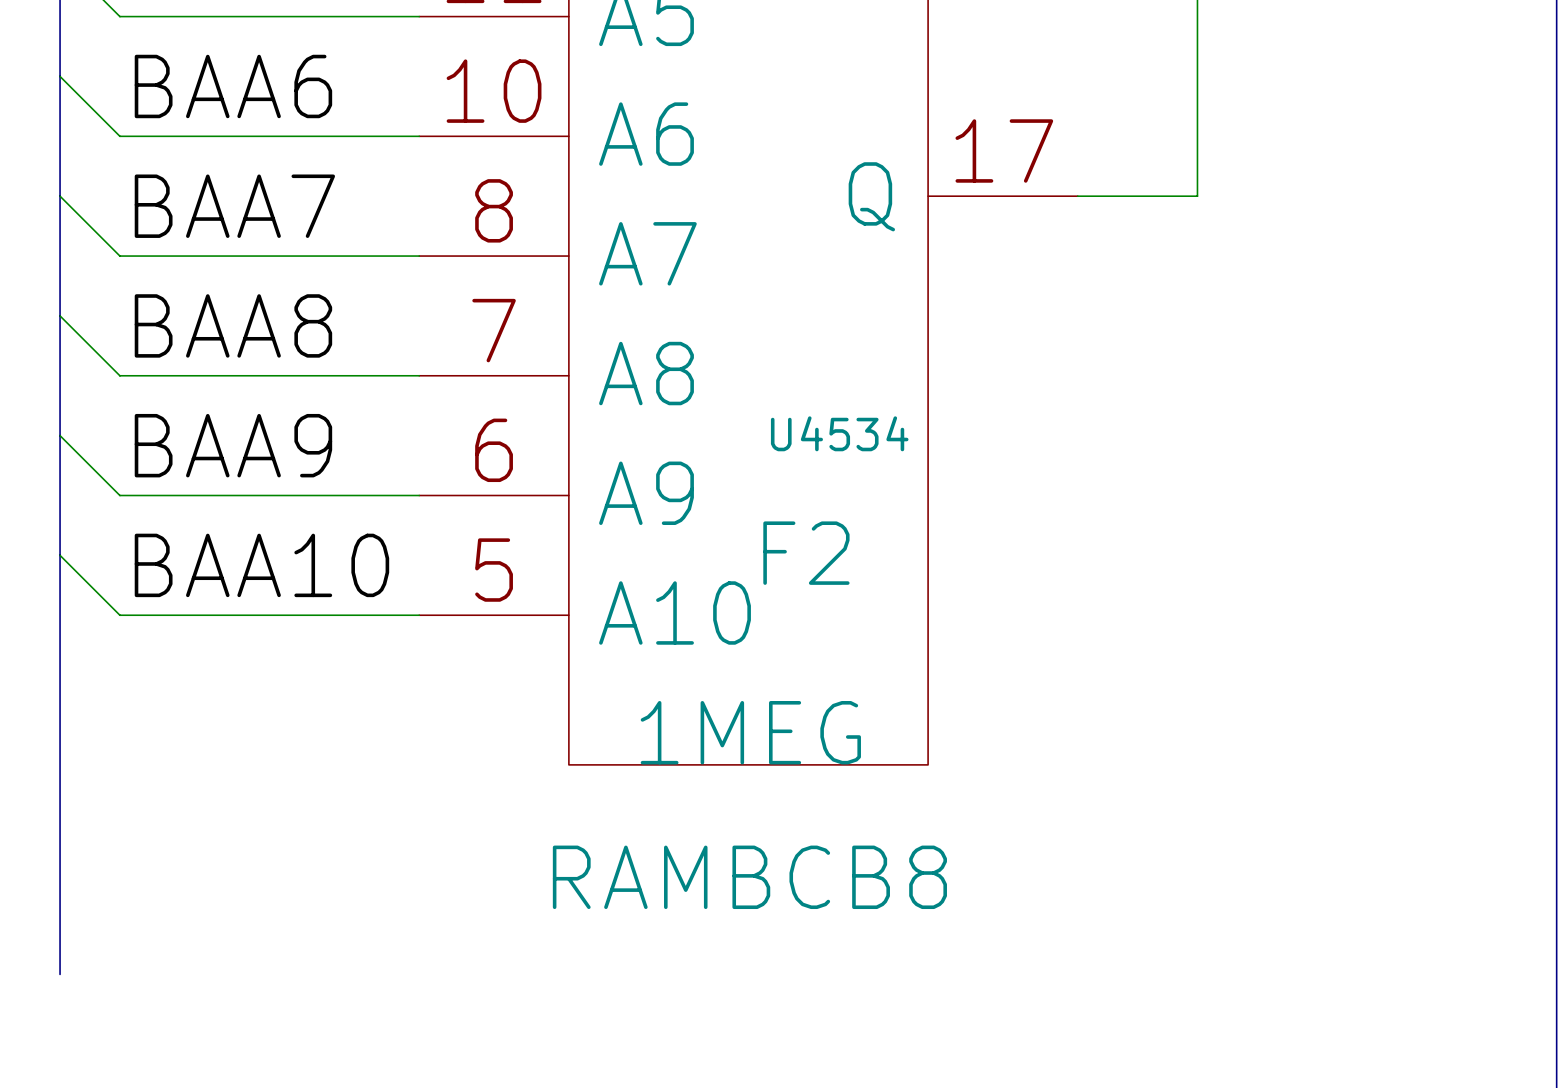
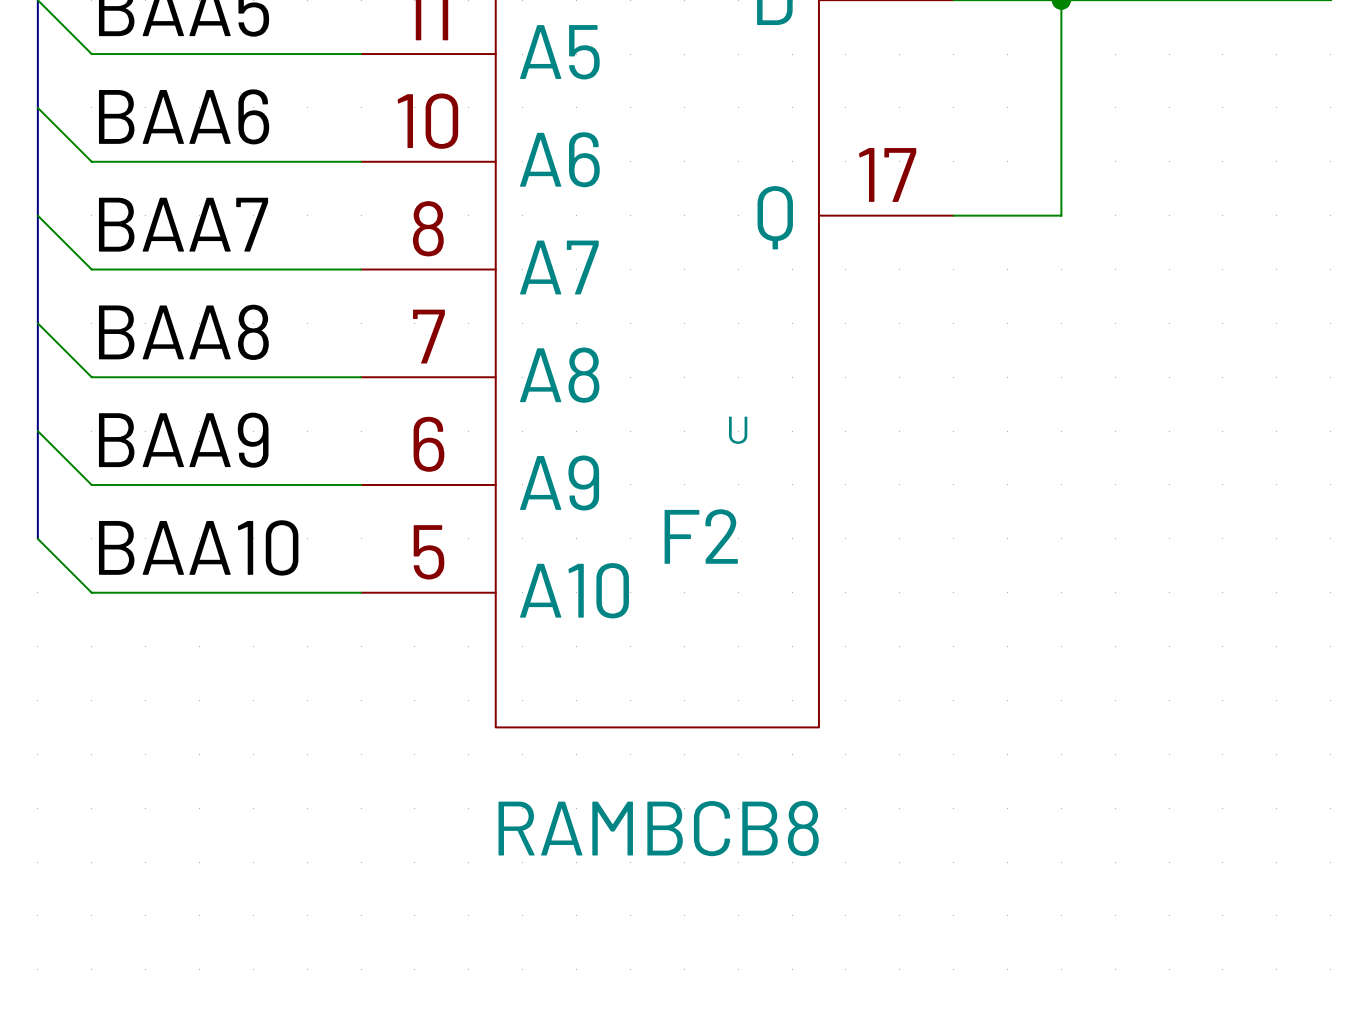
U4534 name: U4534 (839, 433) -> U (738, 430)
bus: (60, 555) (60, 974) -> none
U4534 value: 1MEG (750, 732) -> none

